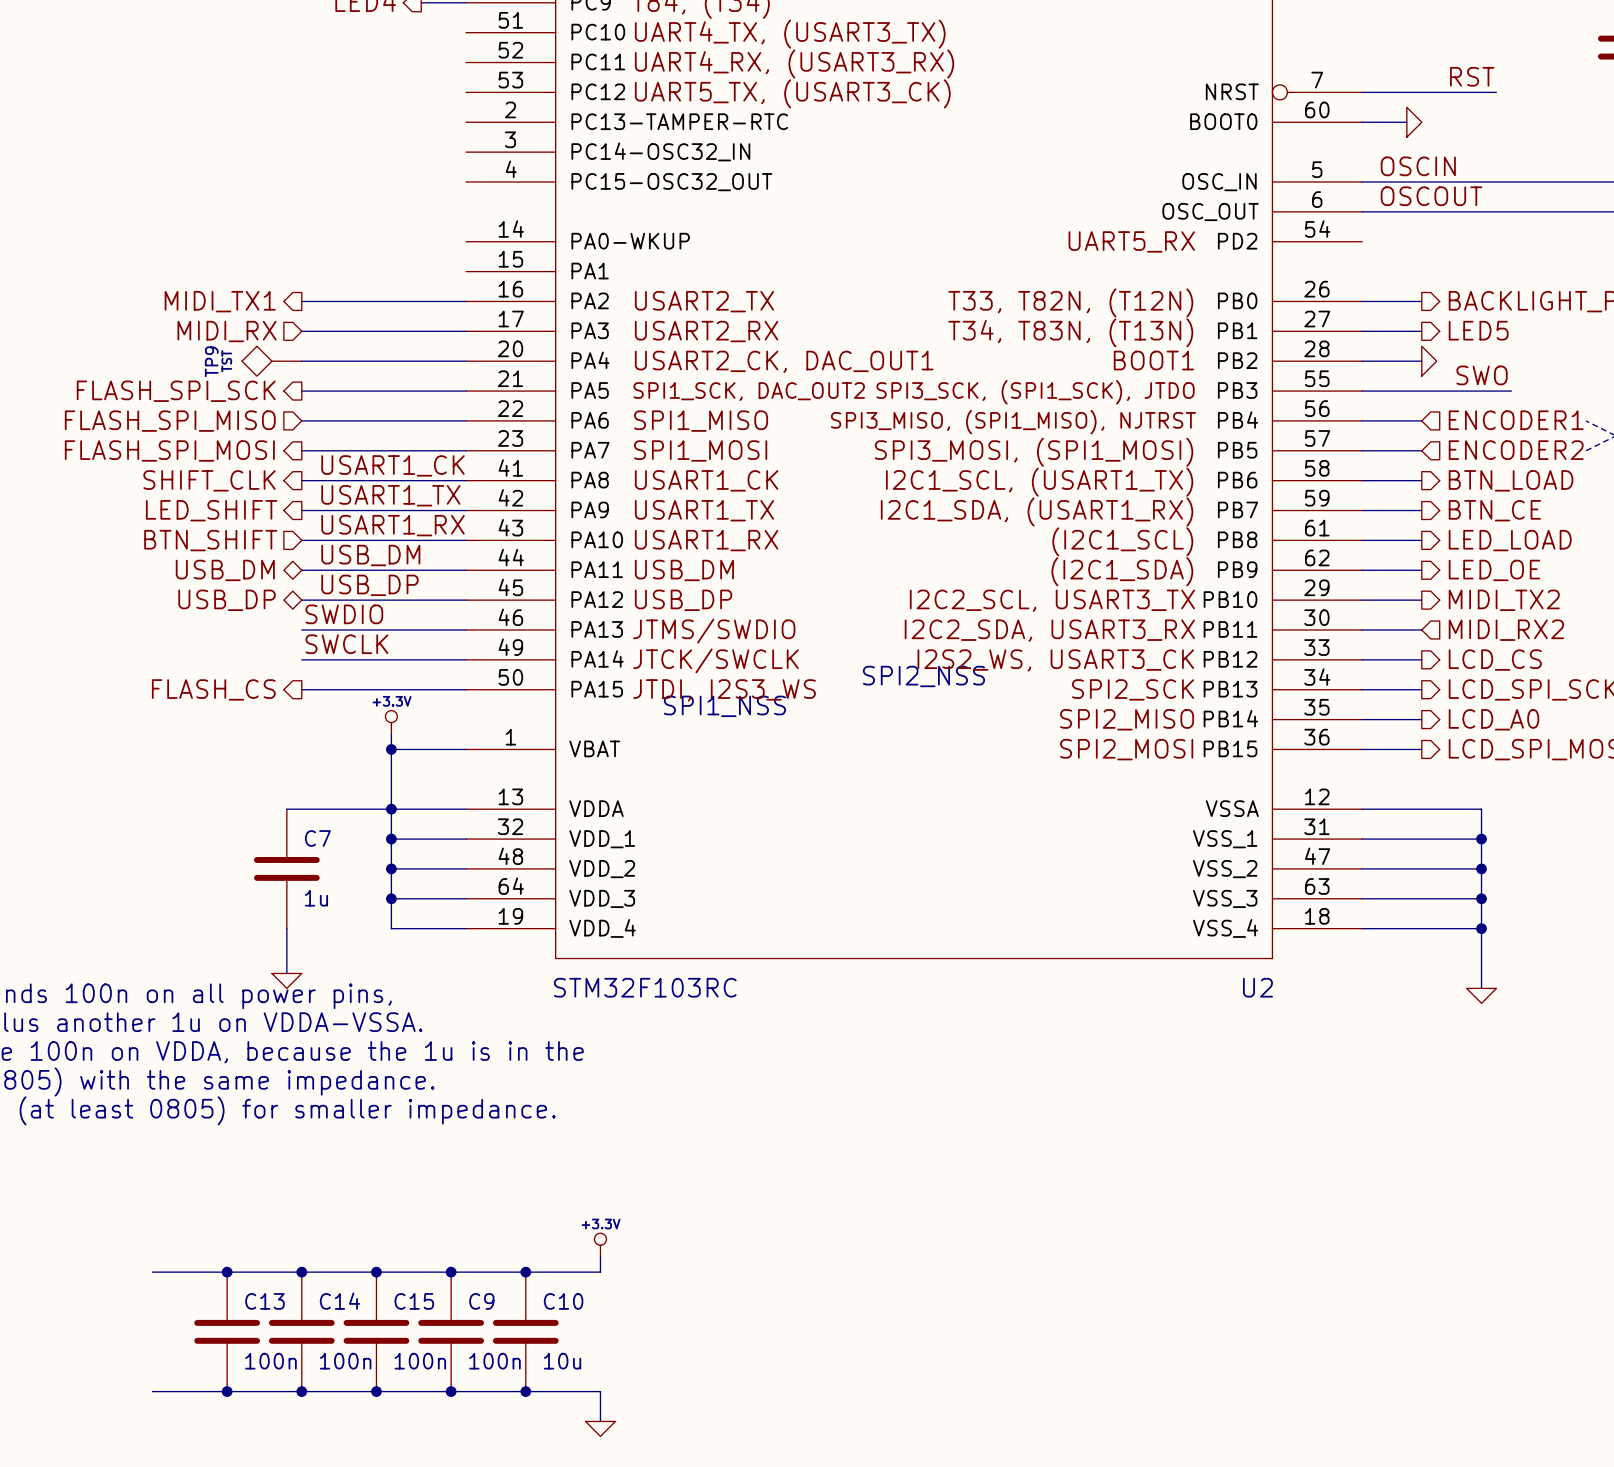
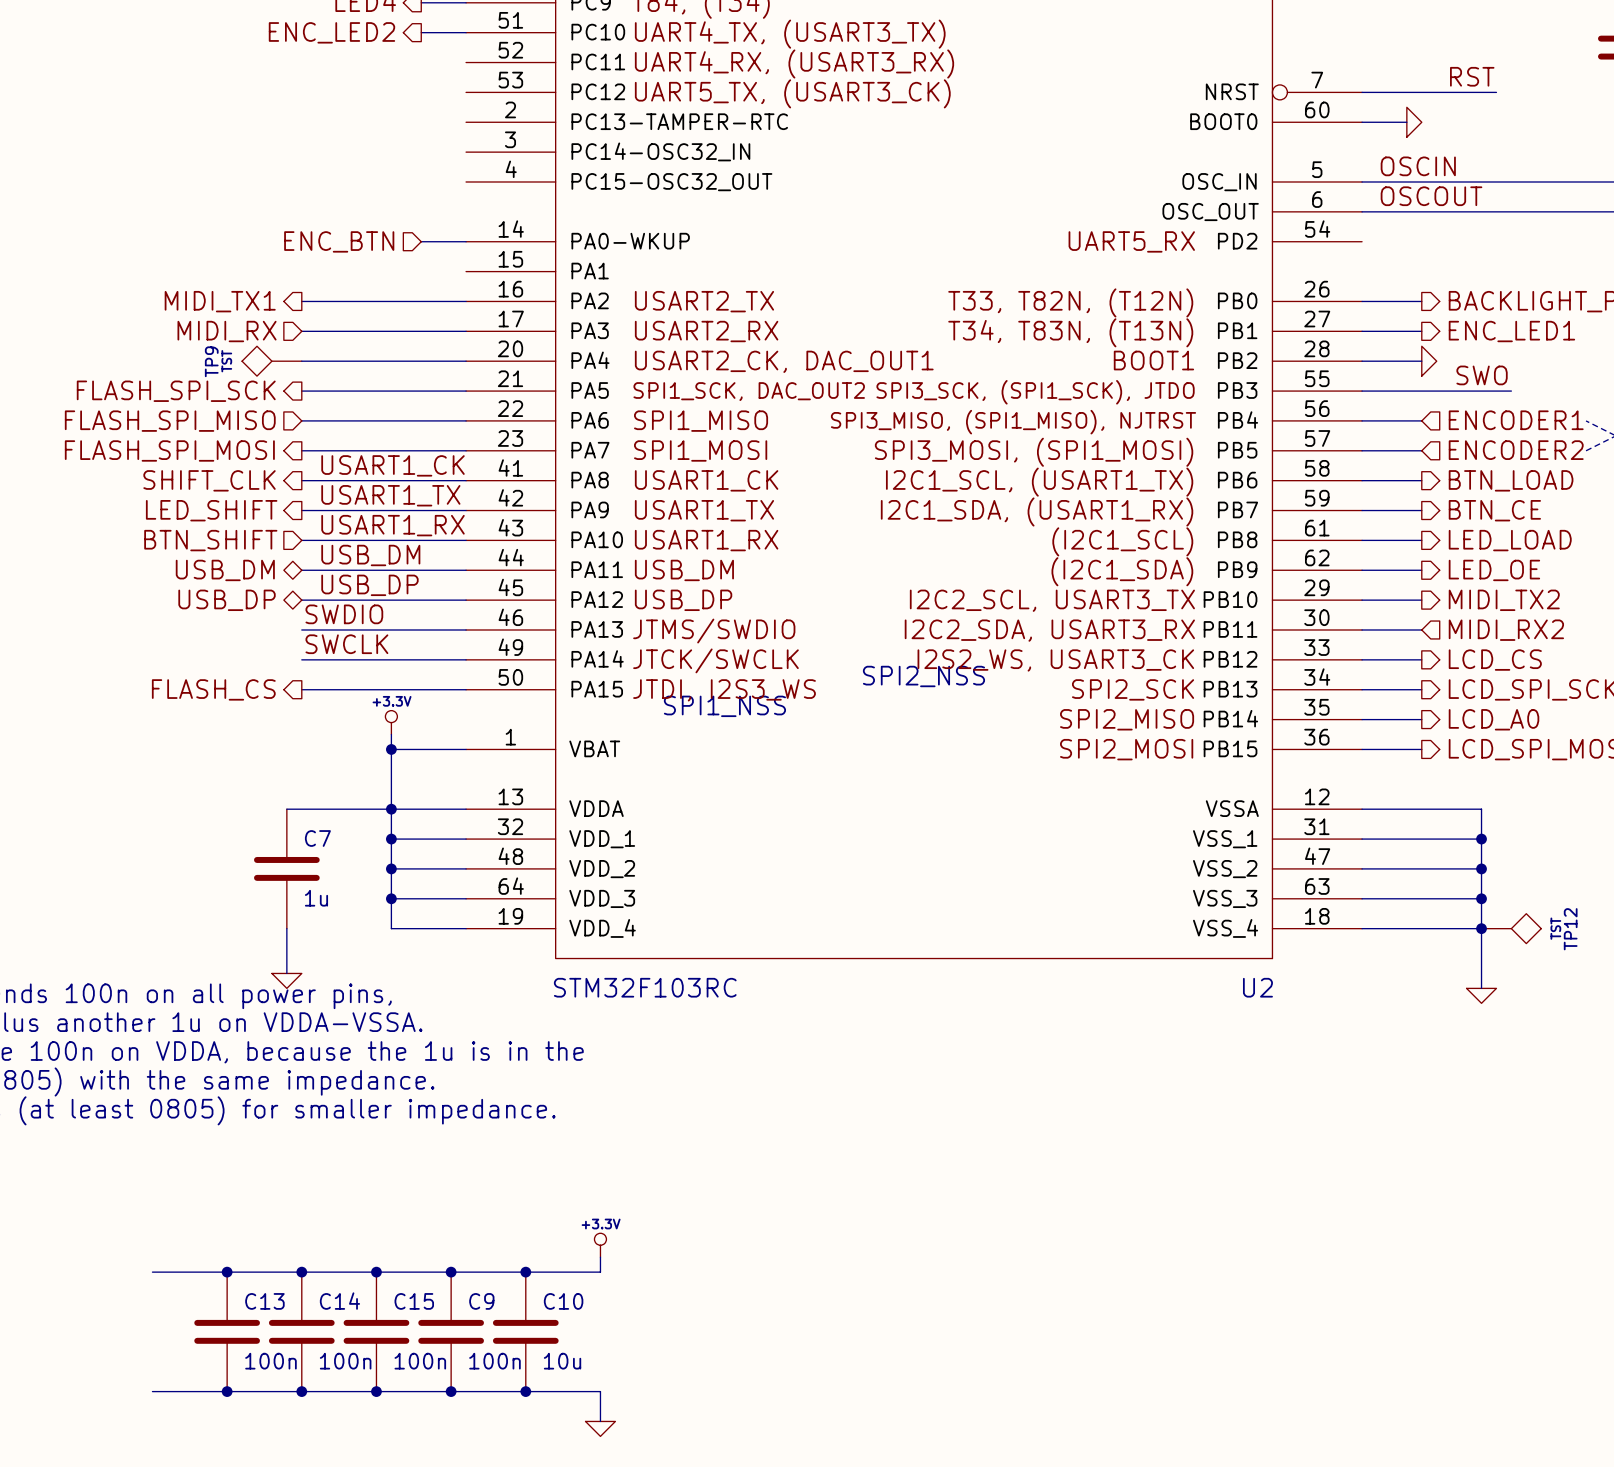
hierarchical label: none -> ENC_LED2 (331, 32)
wire: none -> (421, 32) (466, 32)
hierarchical label: none -> ENC_BTN (339, 241)
wire: none -> (421, 241) (466, 241)
hierarchical label: LED5 (1478, 330) -> ENC_LED1 (1511, 331)
TP12: none -> TST (1511, 928)

